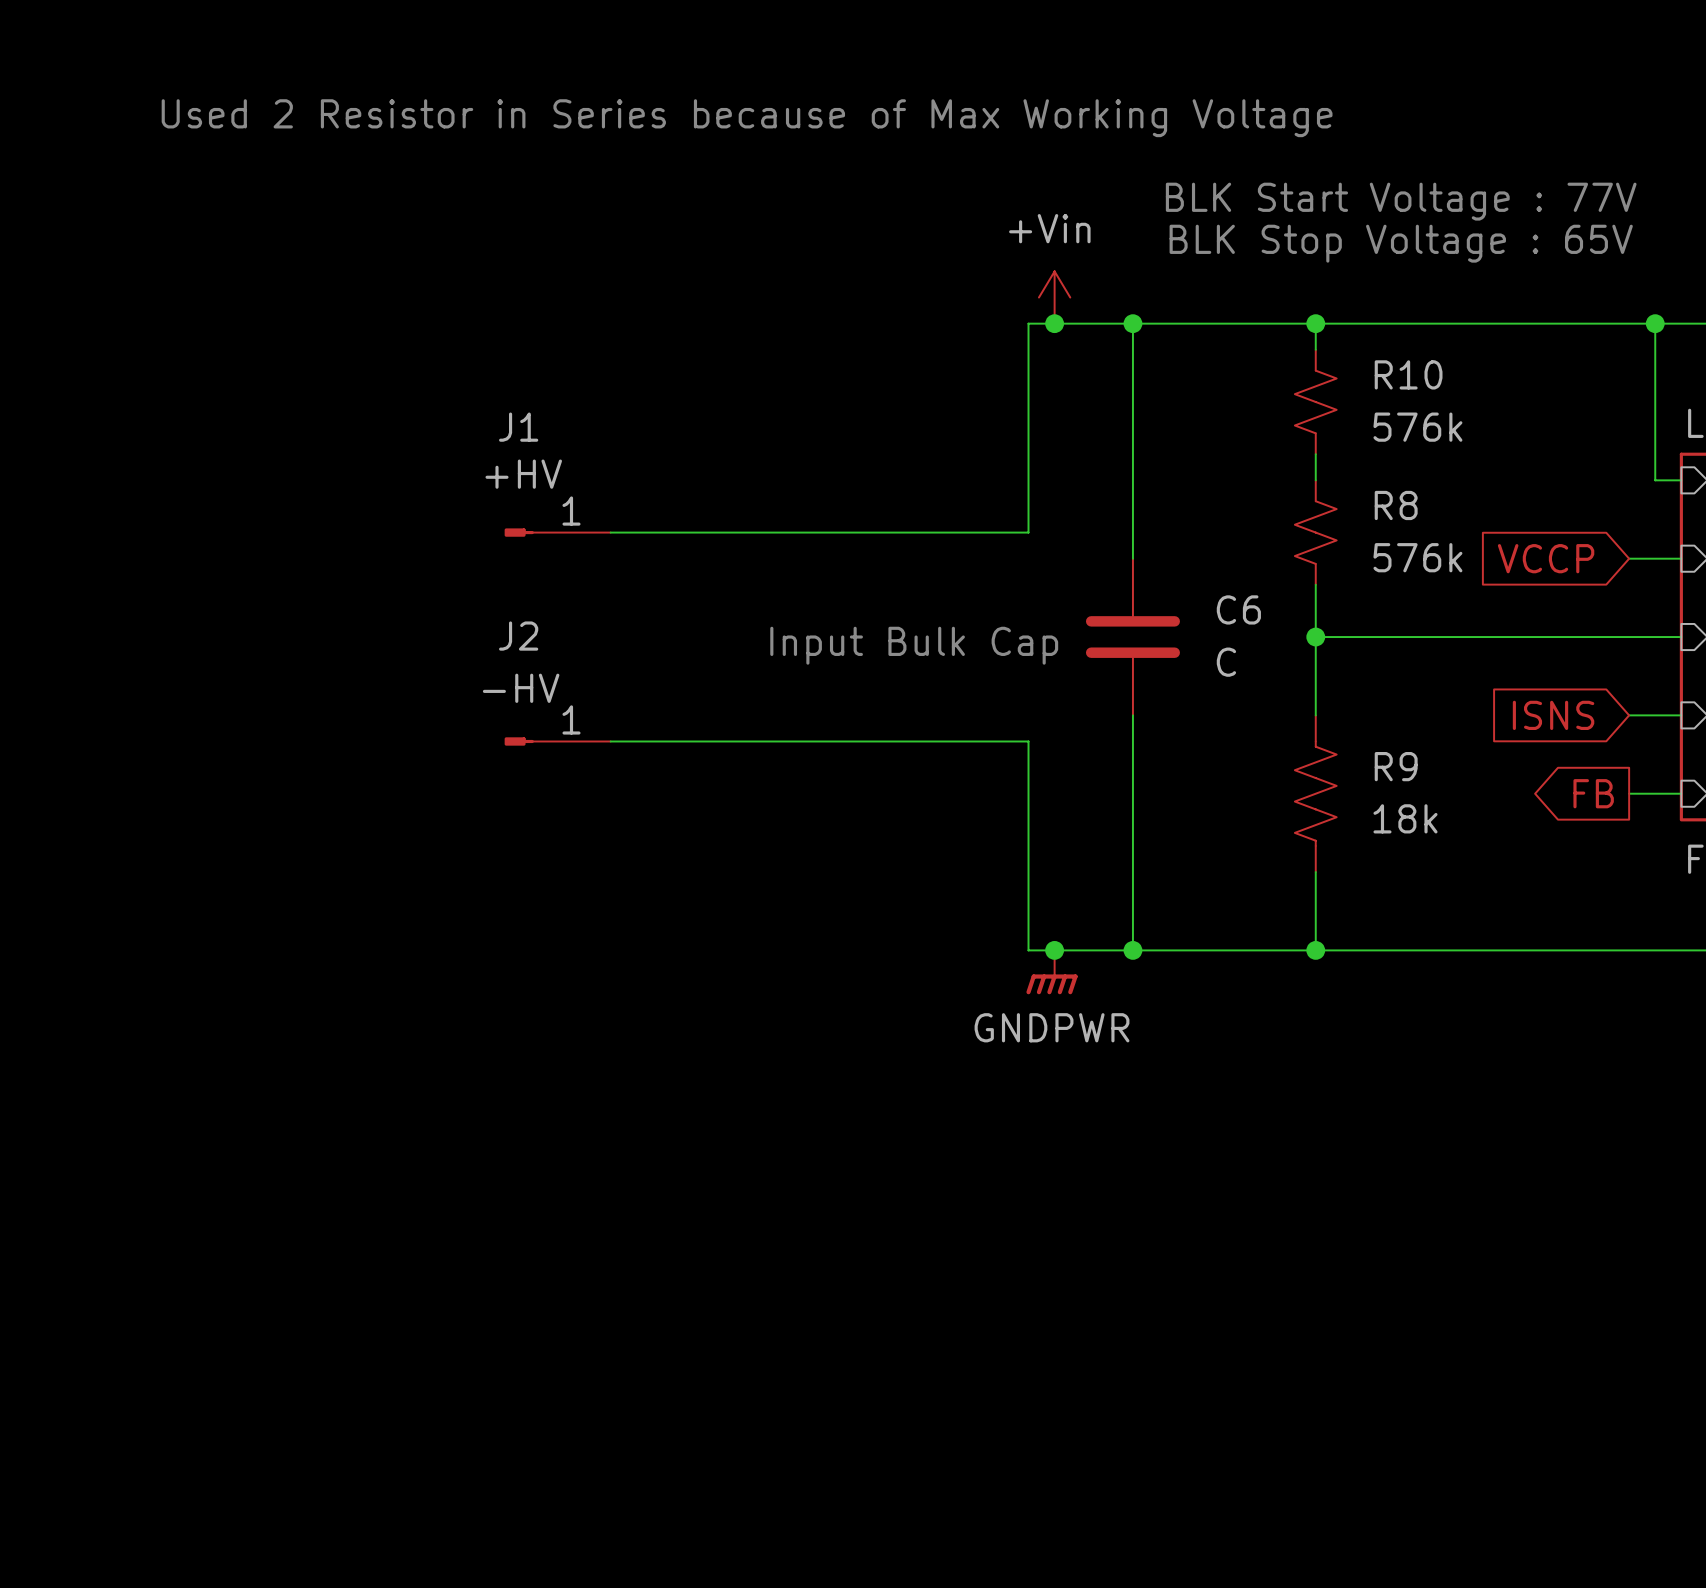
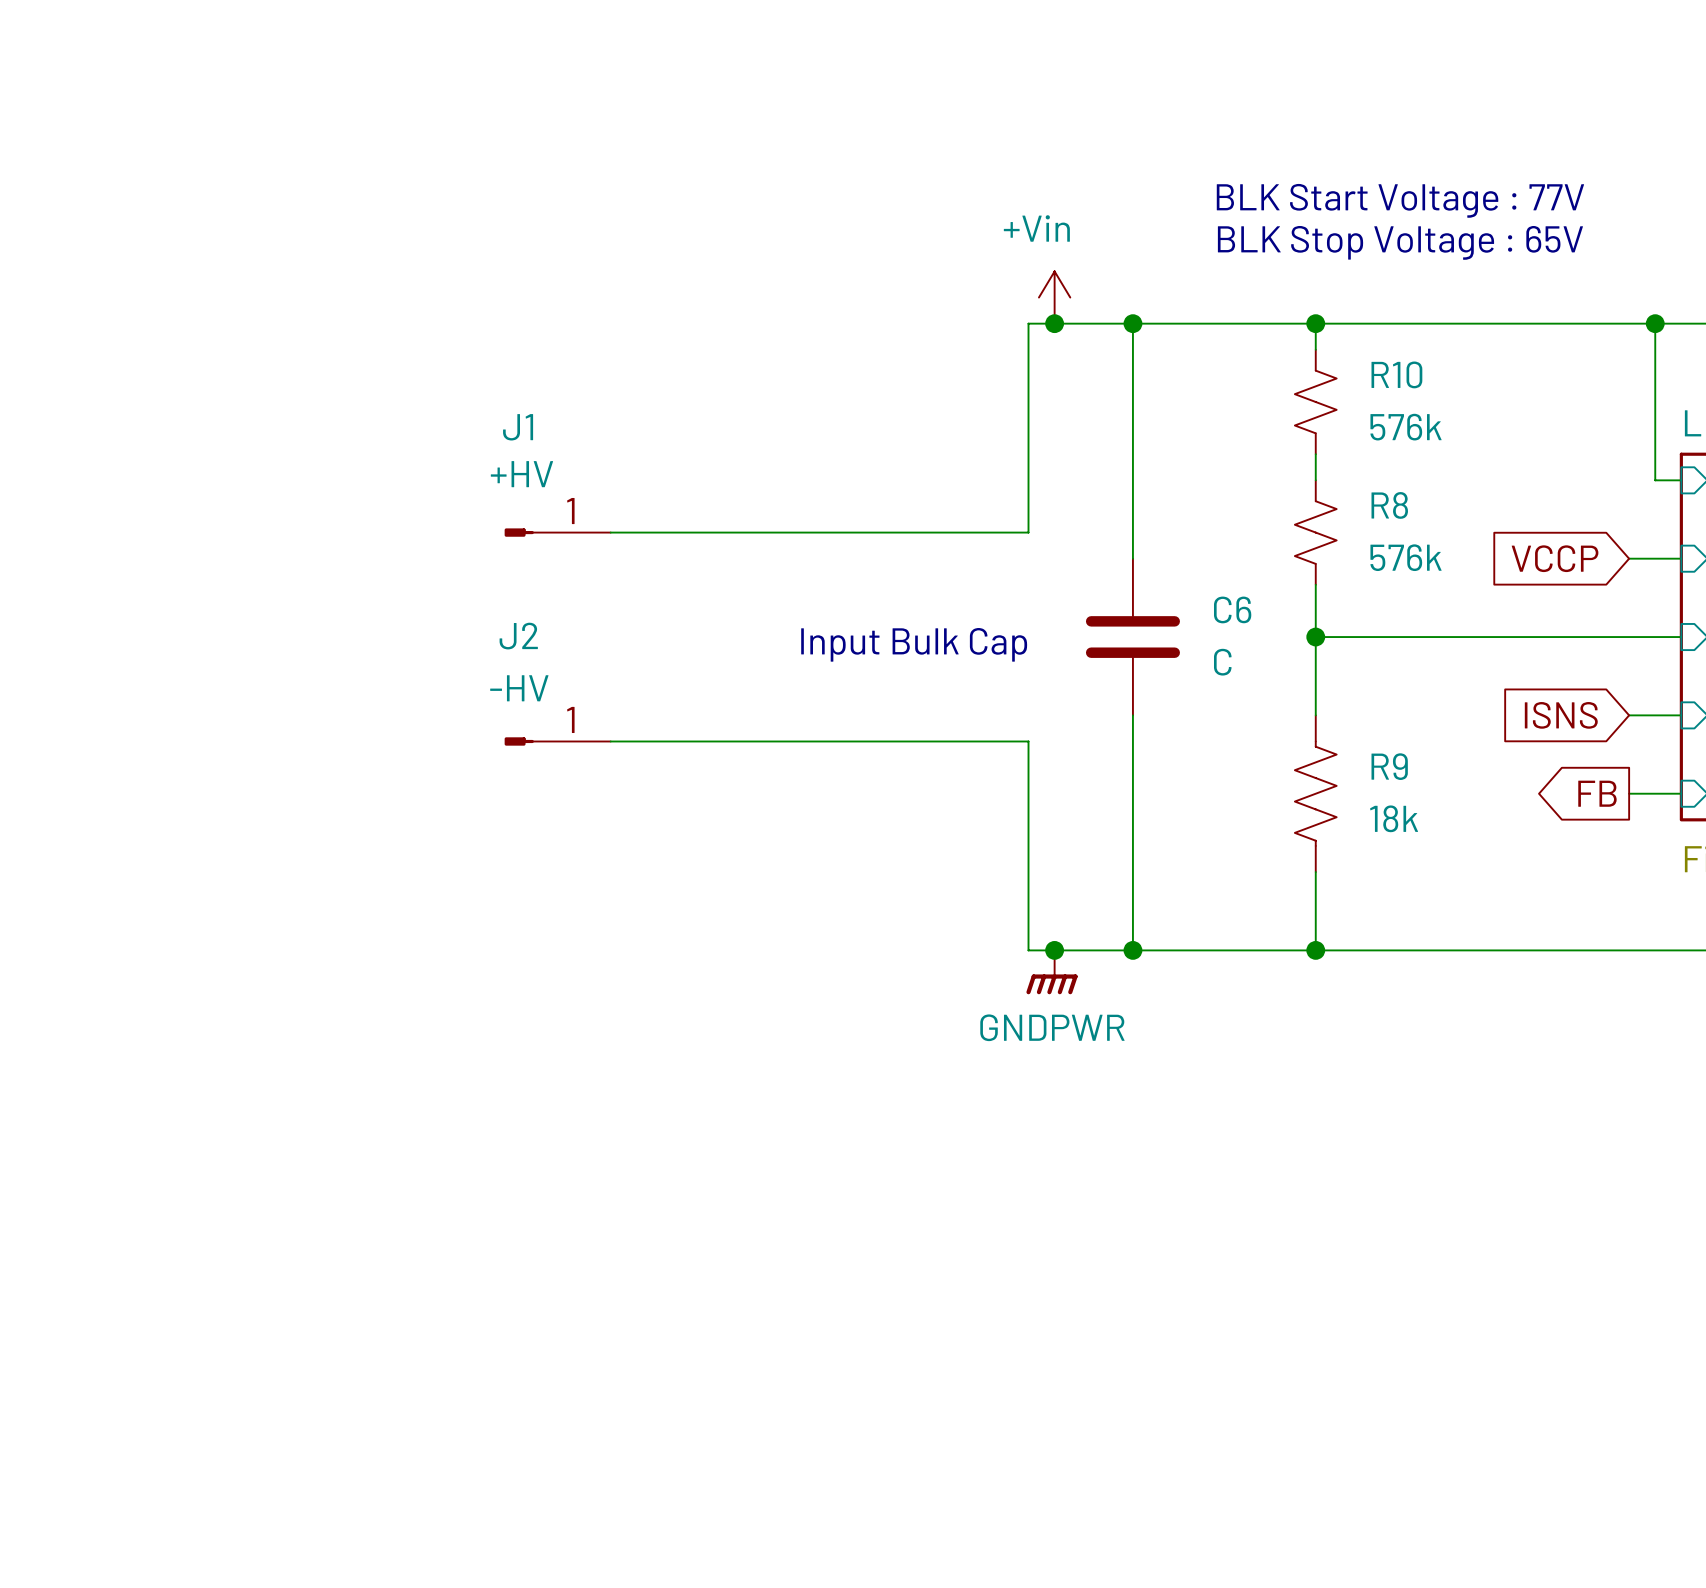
text: Used 2 Resistor in Series because of Max Working Voltage (747, 118) -> none

